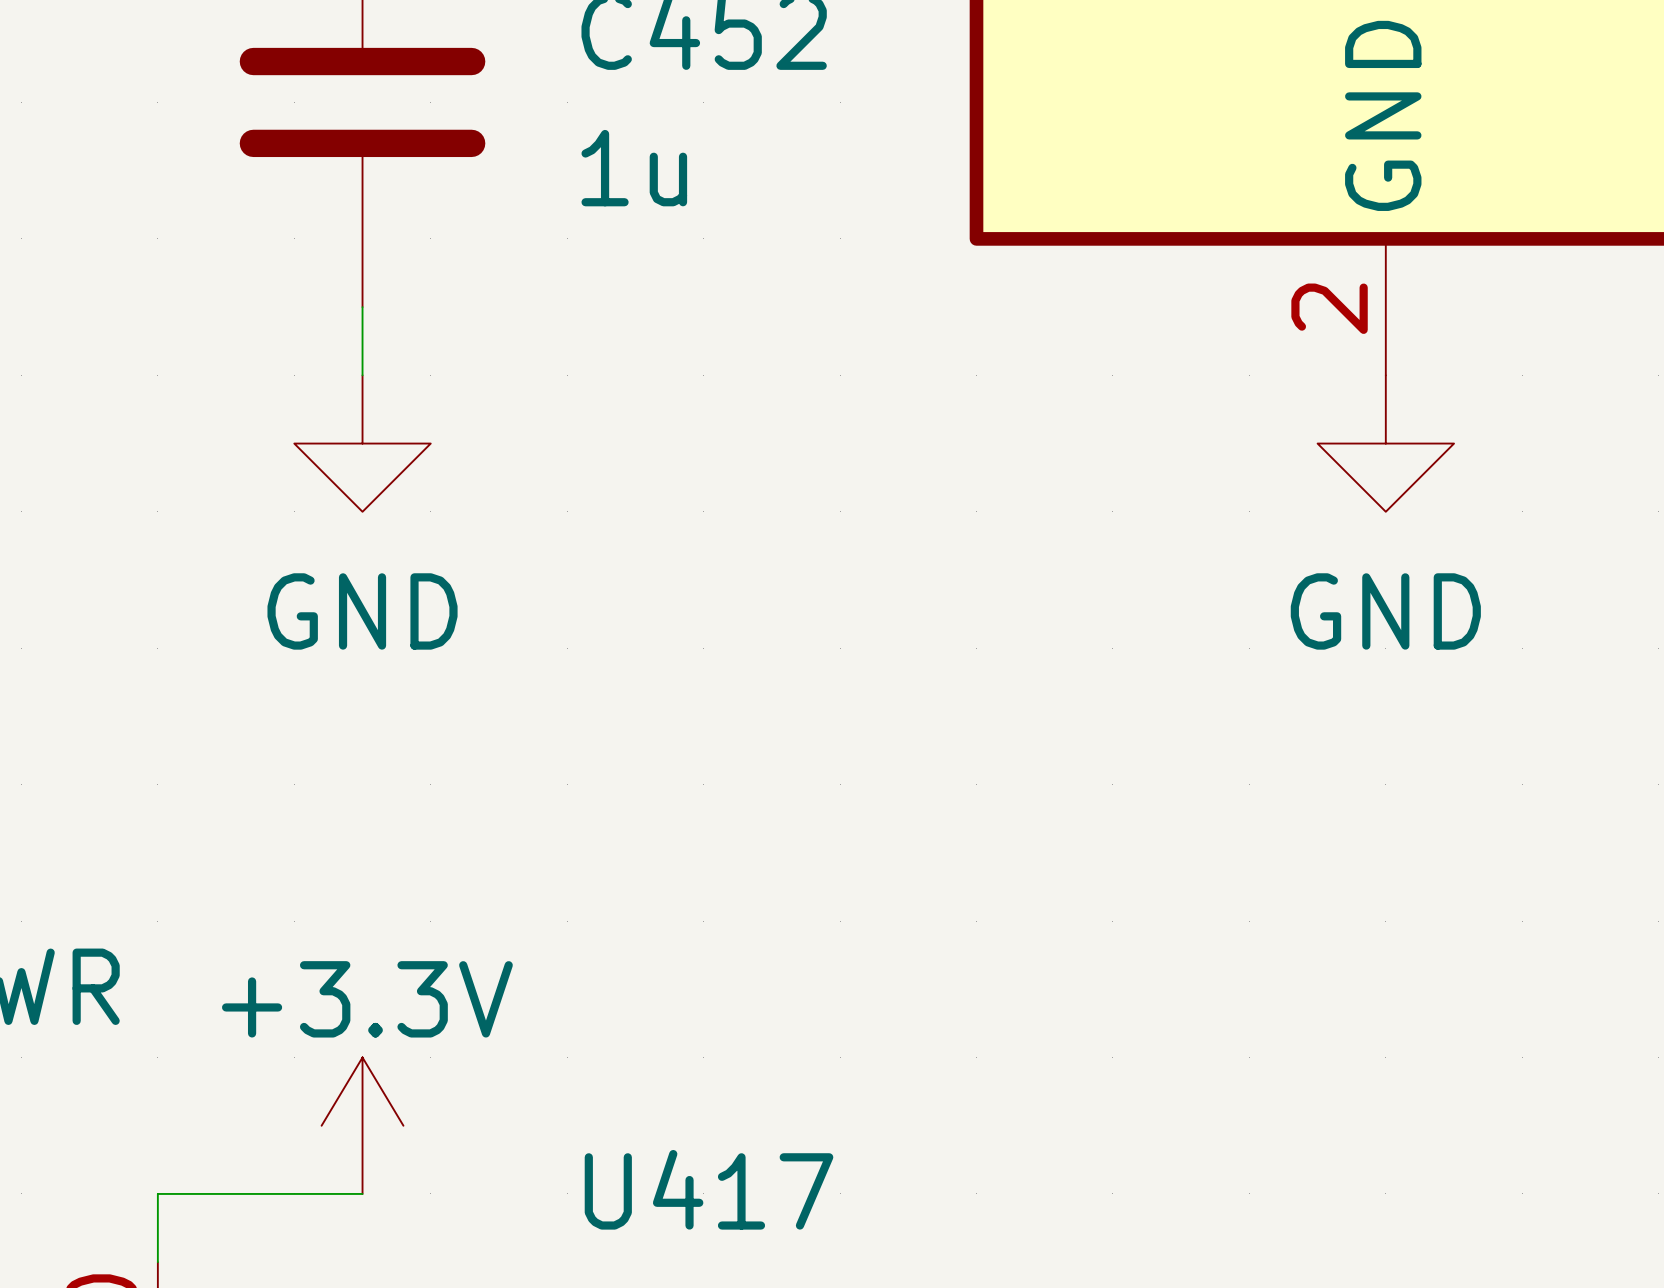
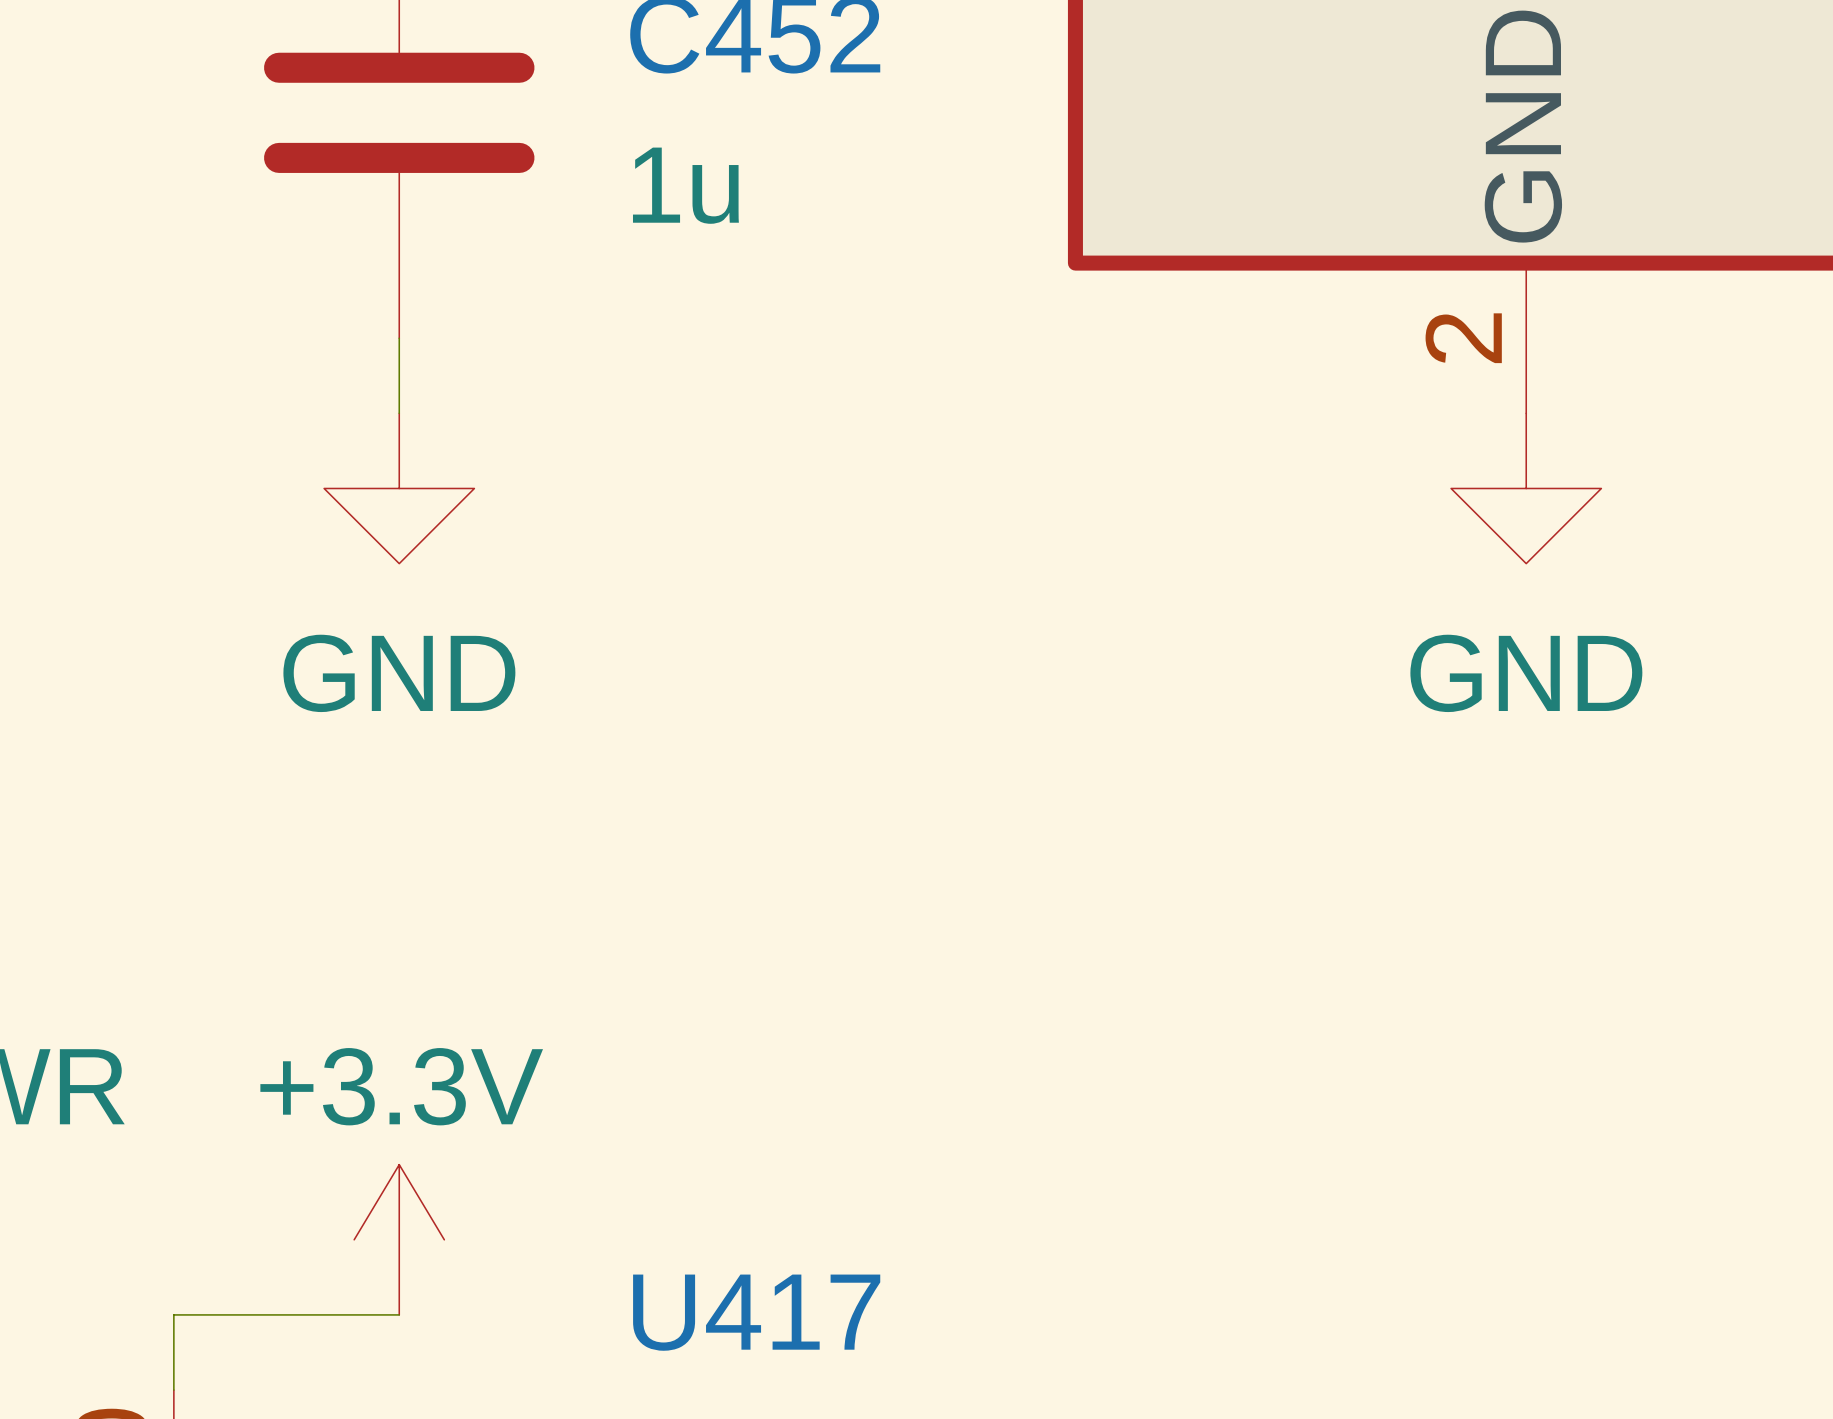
power symbol text position: +3.3V (367, 999) -> +3.3V (401, 1086)

